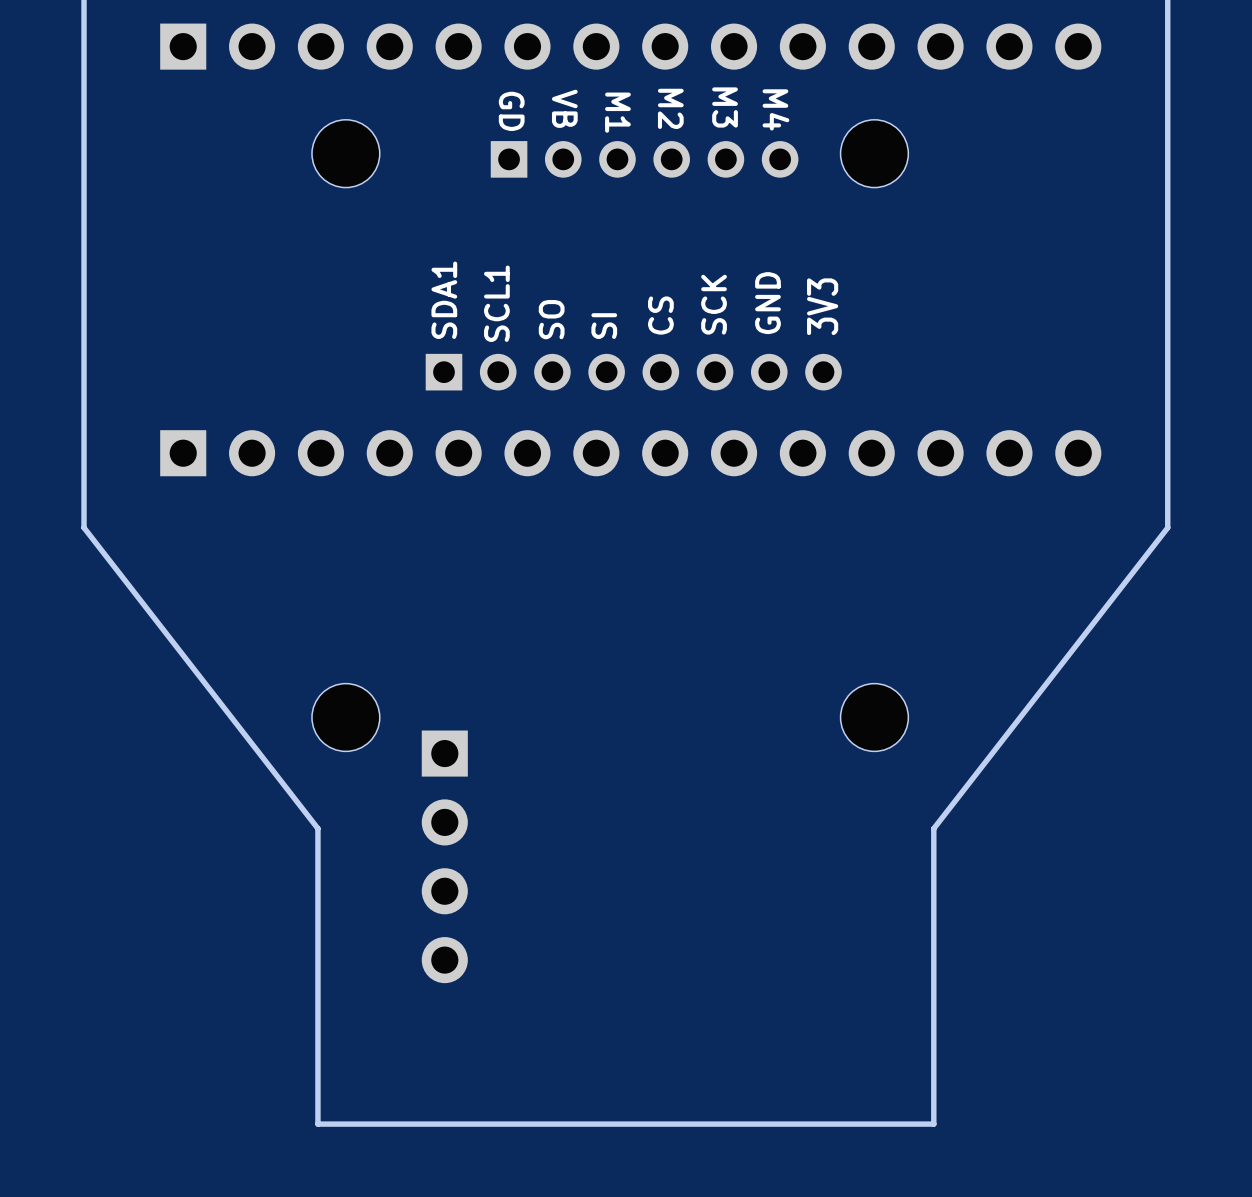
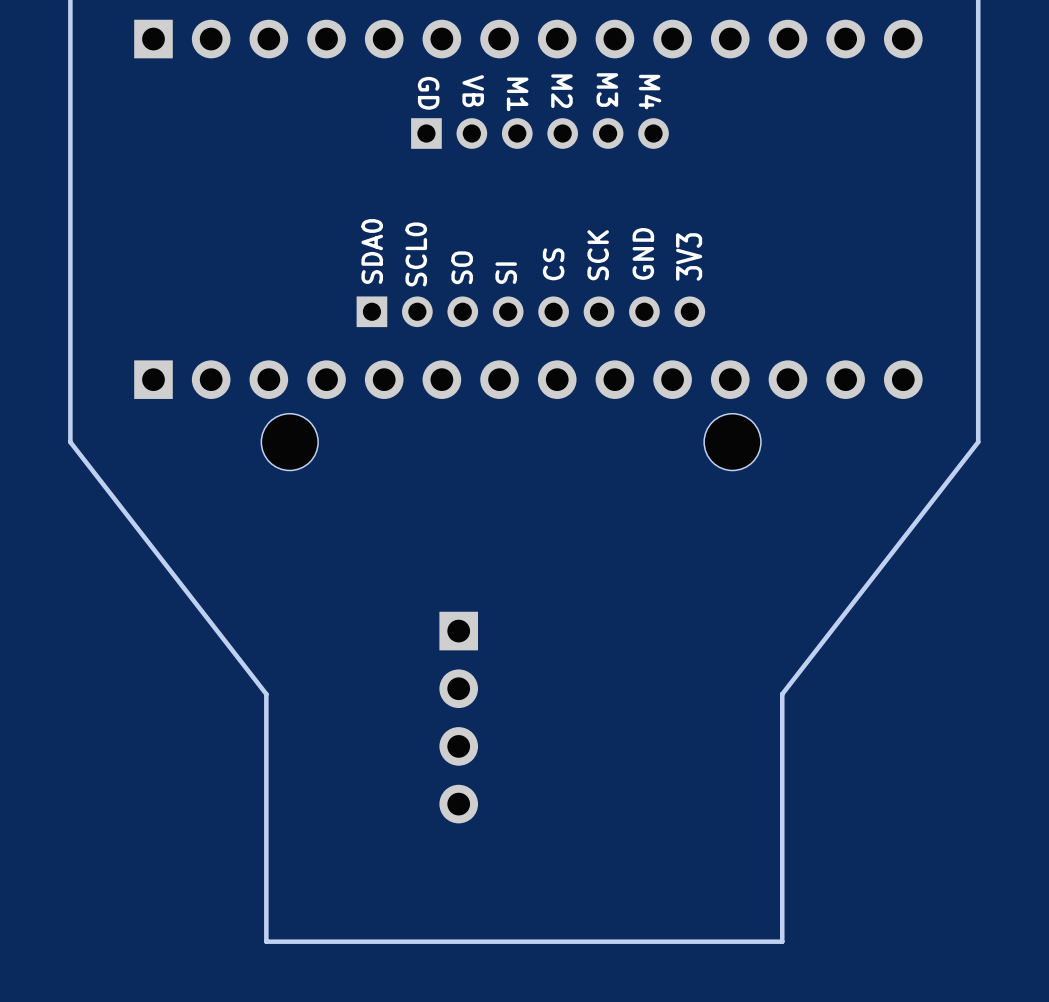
part: (345, 153) -> none
part: (874, 153) -> none
text: SDA1 (444, 300) -> SDA0 (372, 251)
text: SCL1 (496, 303) -> SCL0 (416, 254)
part: none -> (289, 442)
part: none -> (732, 442)
part: (345, 717) -> none
part: (874, 717) -> none
part position: (444, 856) -> (458, 717)

